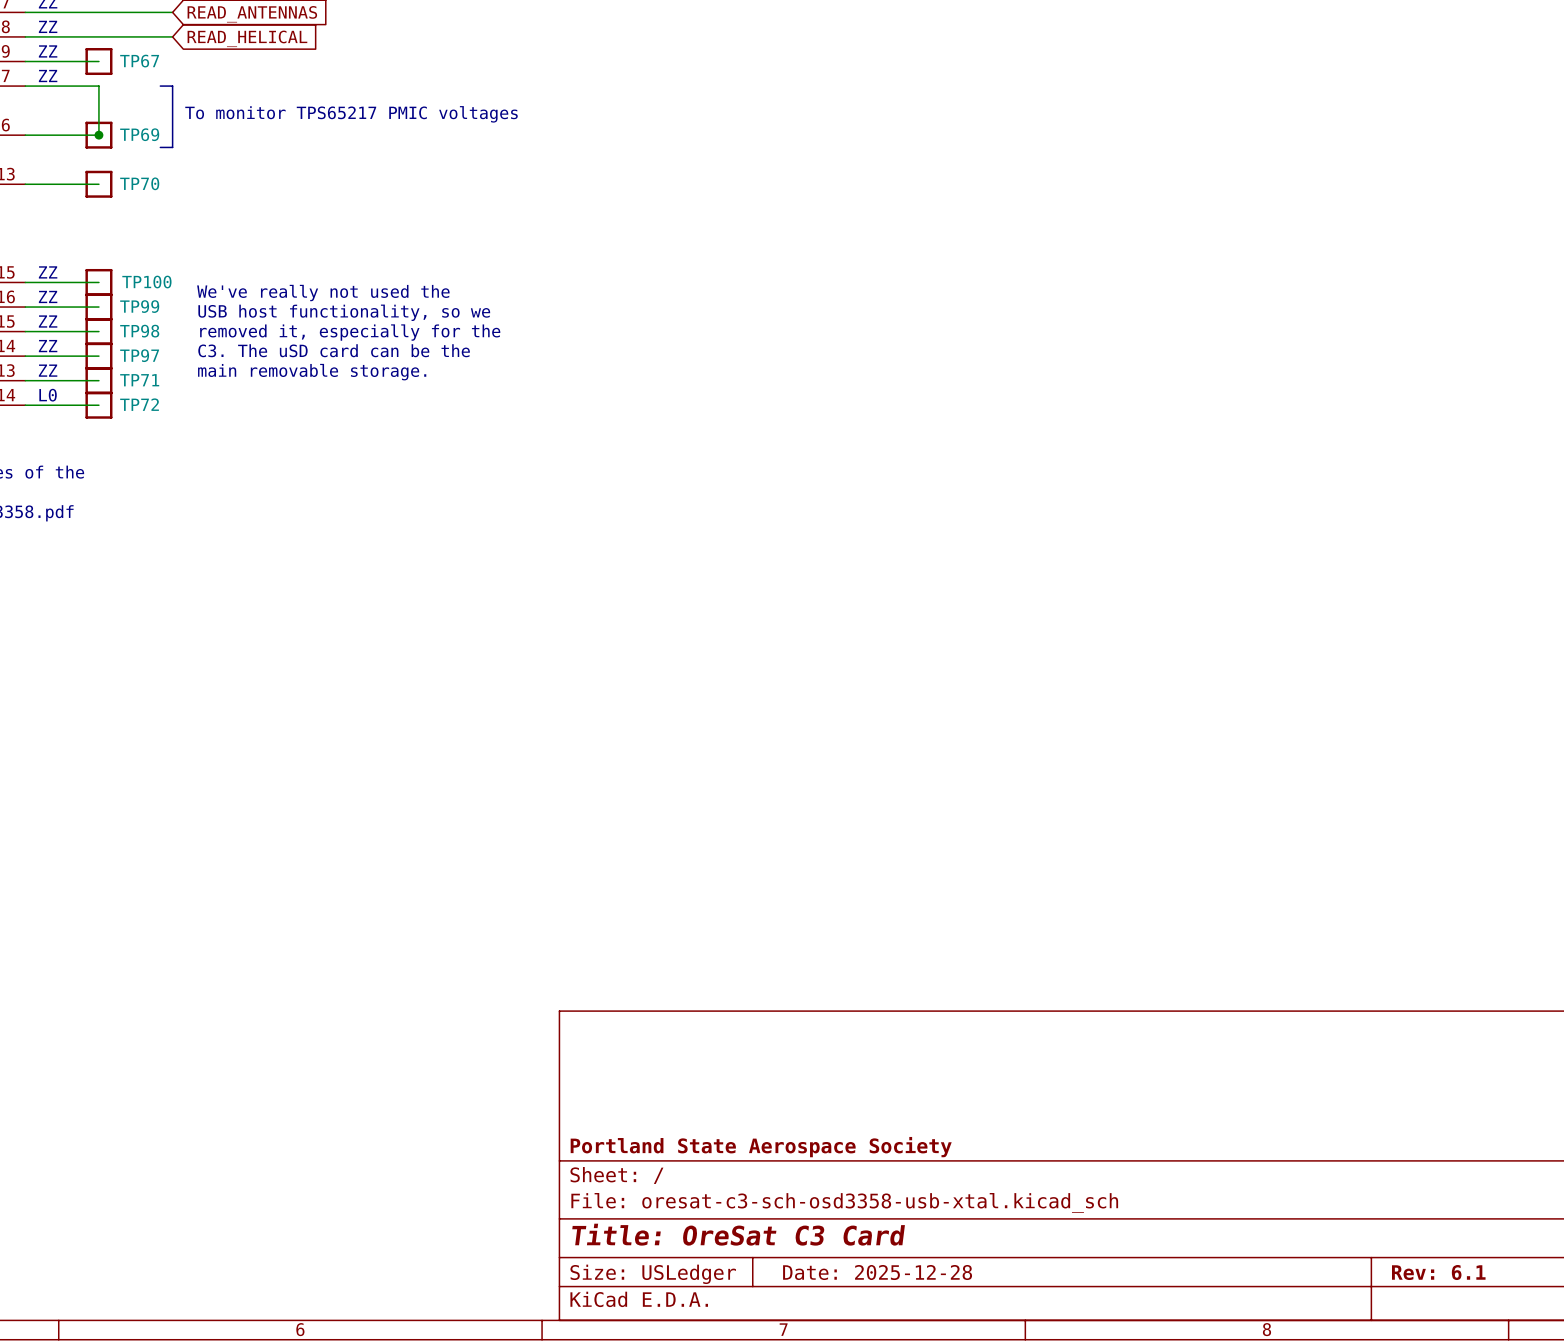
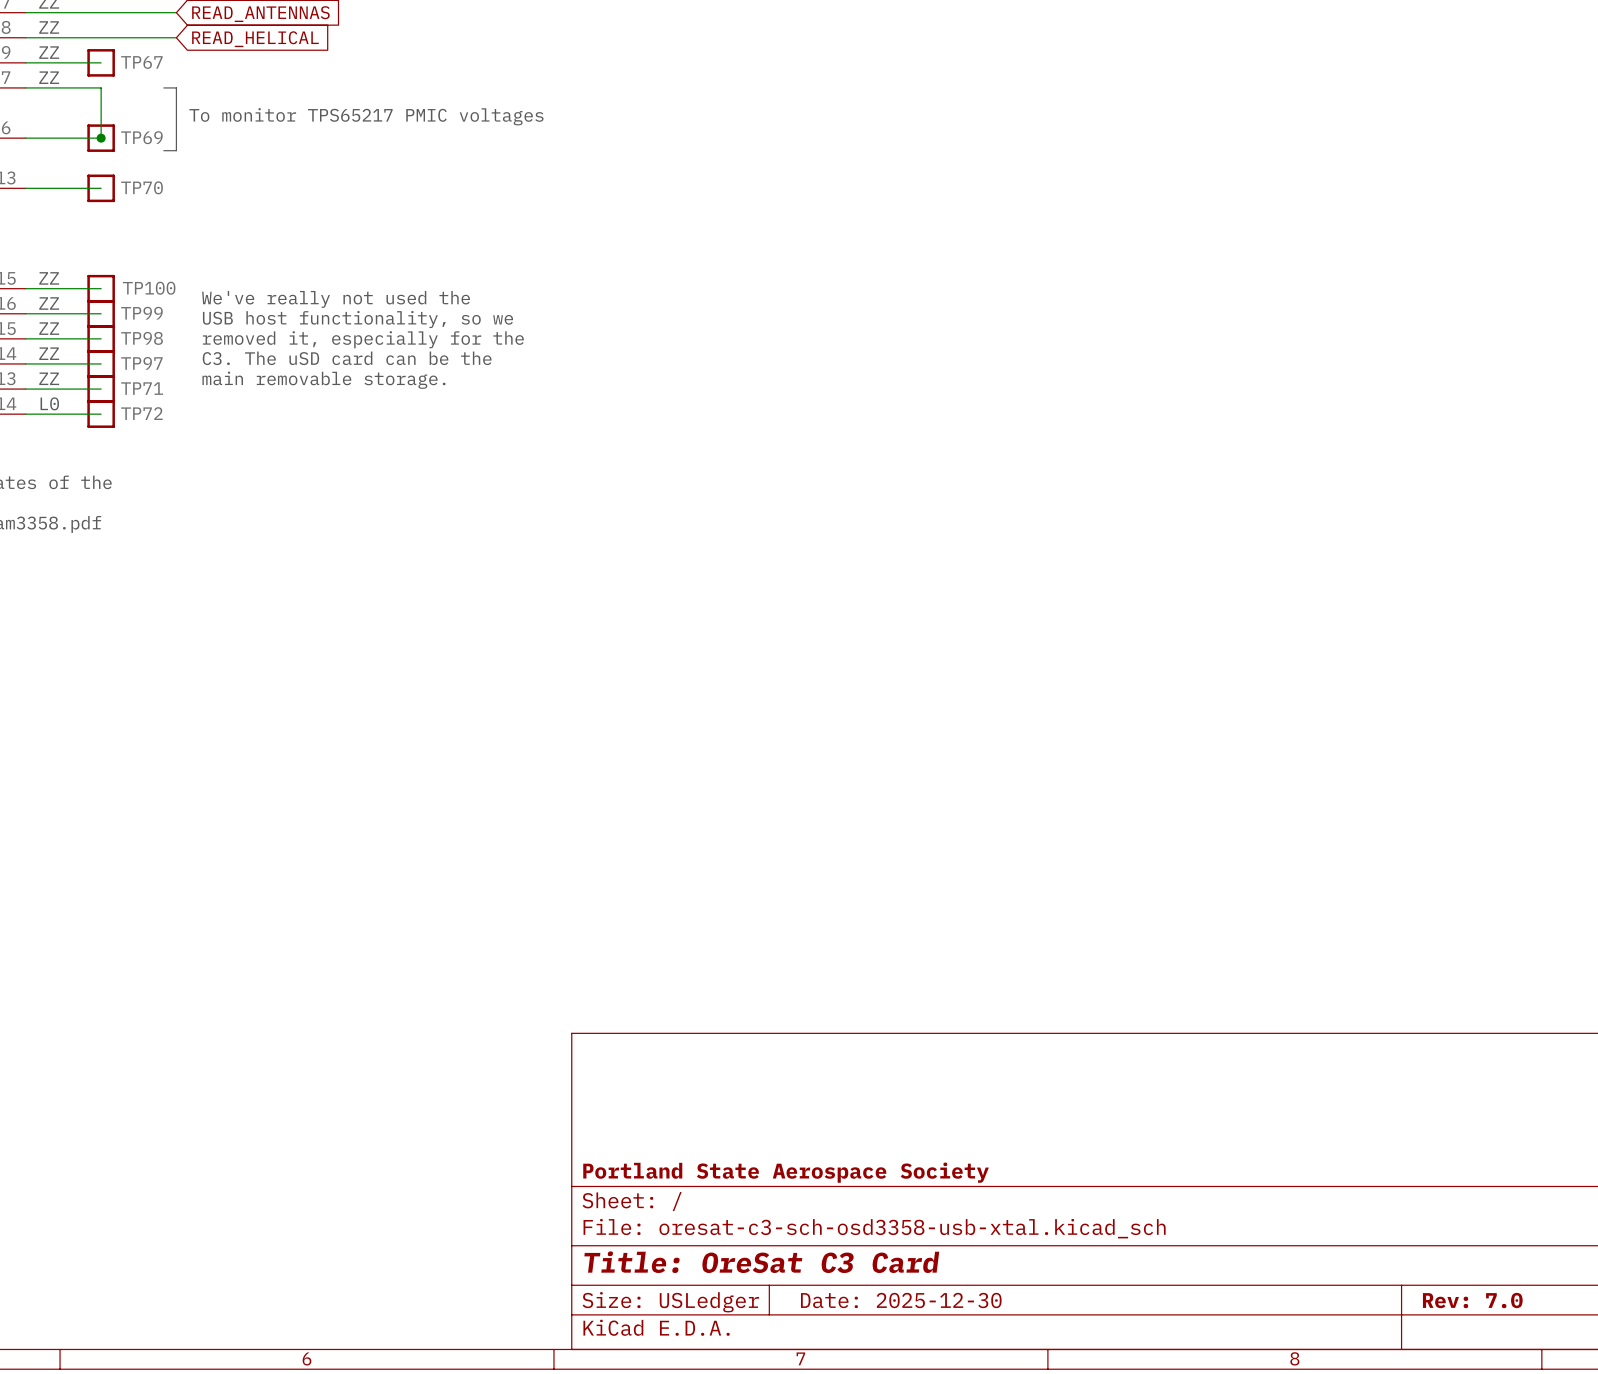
title block: Date: 2025-12-28 (877, 1272) -> Date: 2025-12-30 (901, 1300)
title block: Rev: 6.1 (1438, 1272) -> Rev: 7.0 (1472, 1300)

